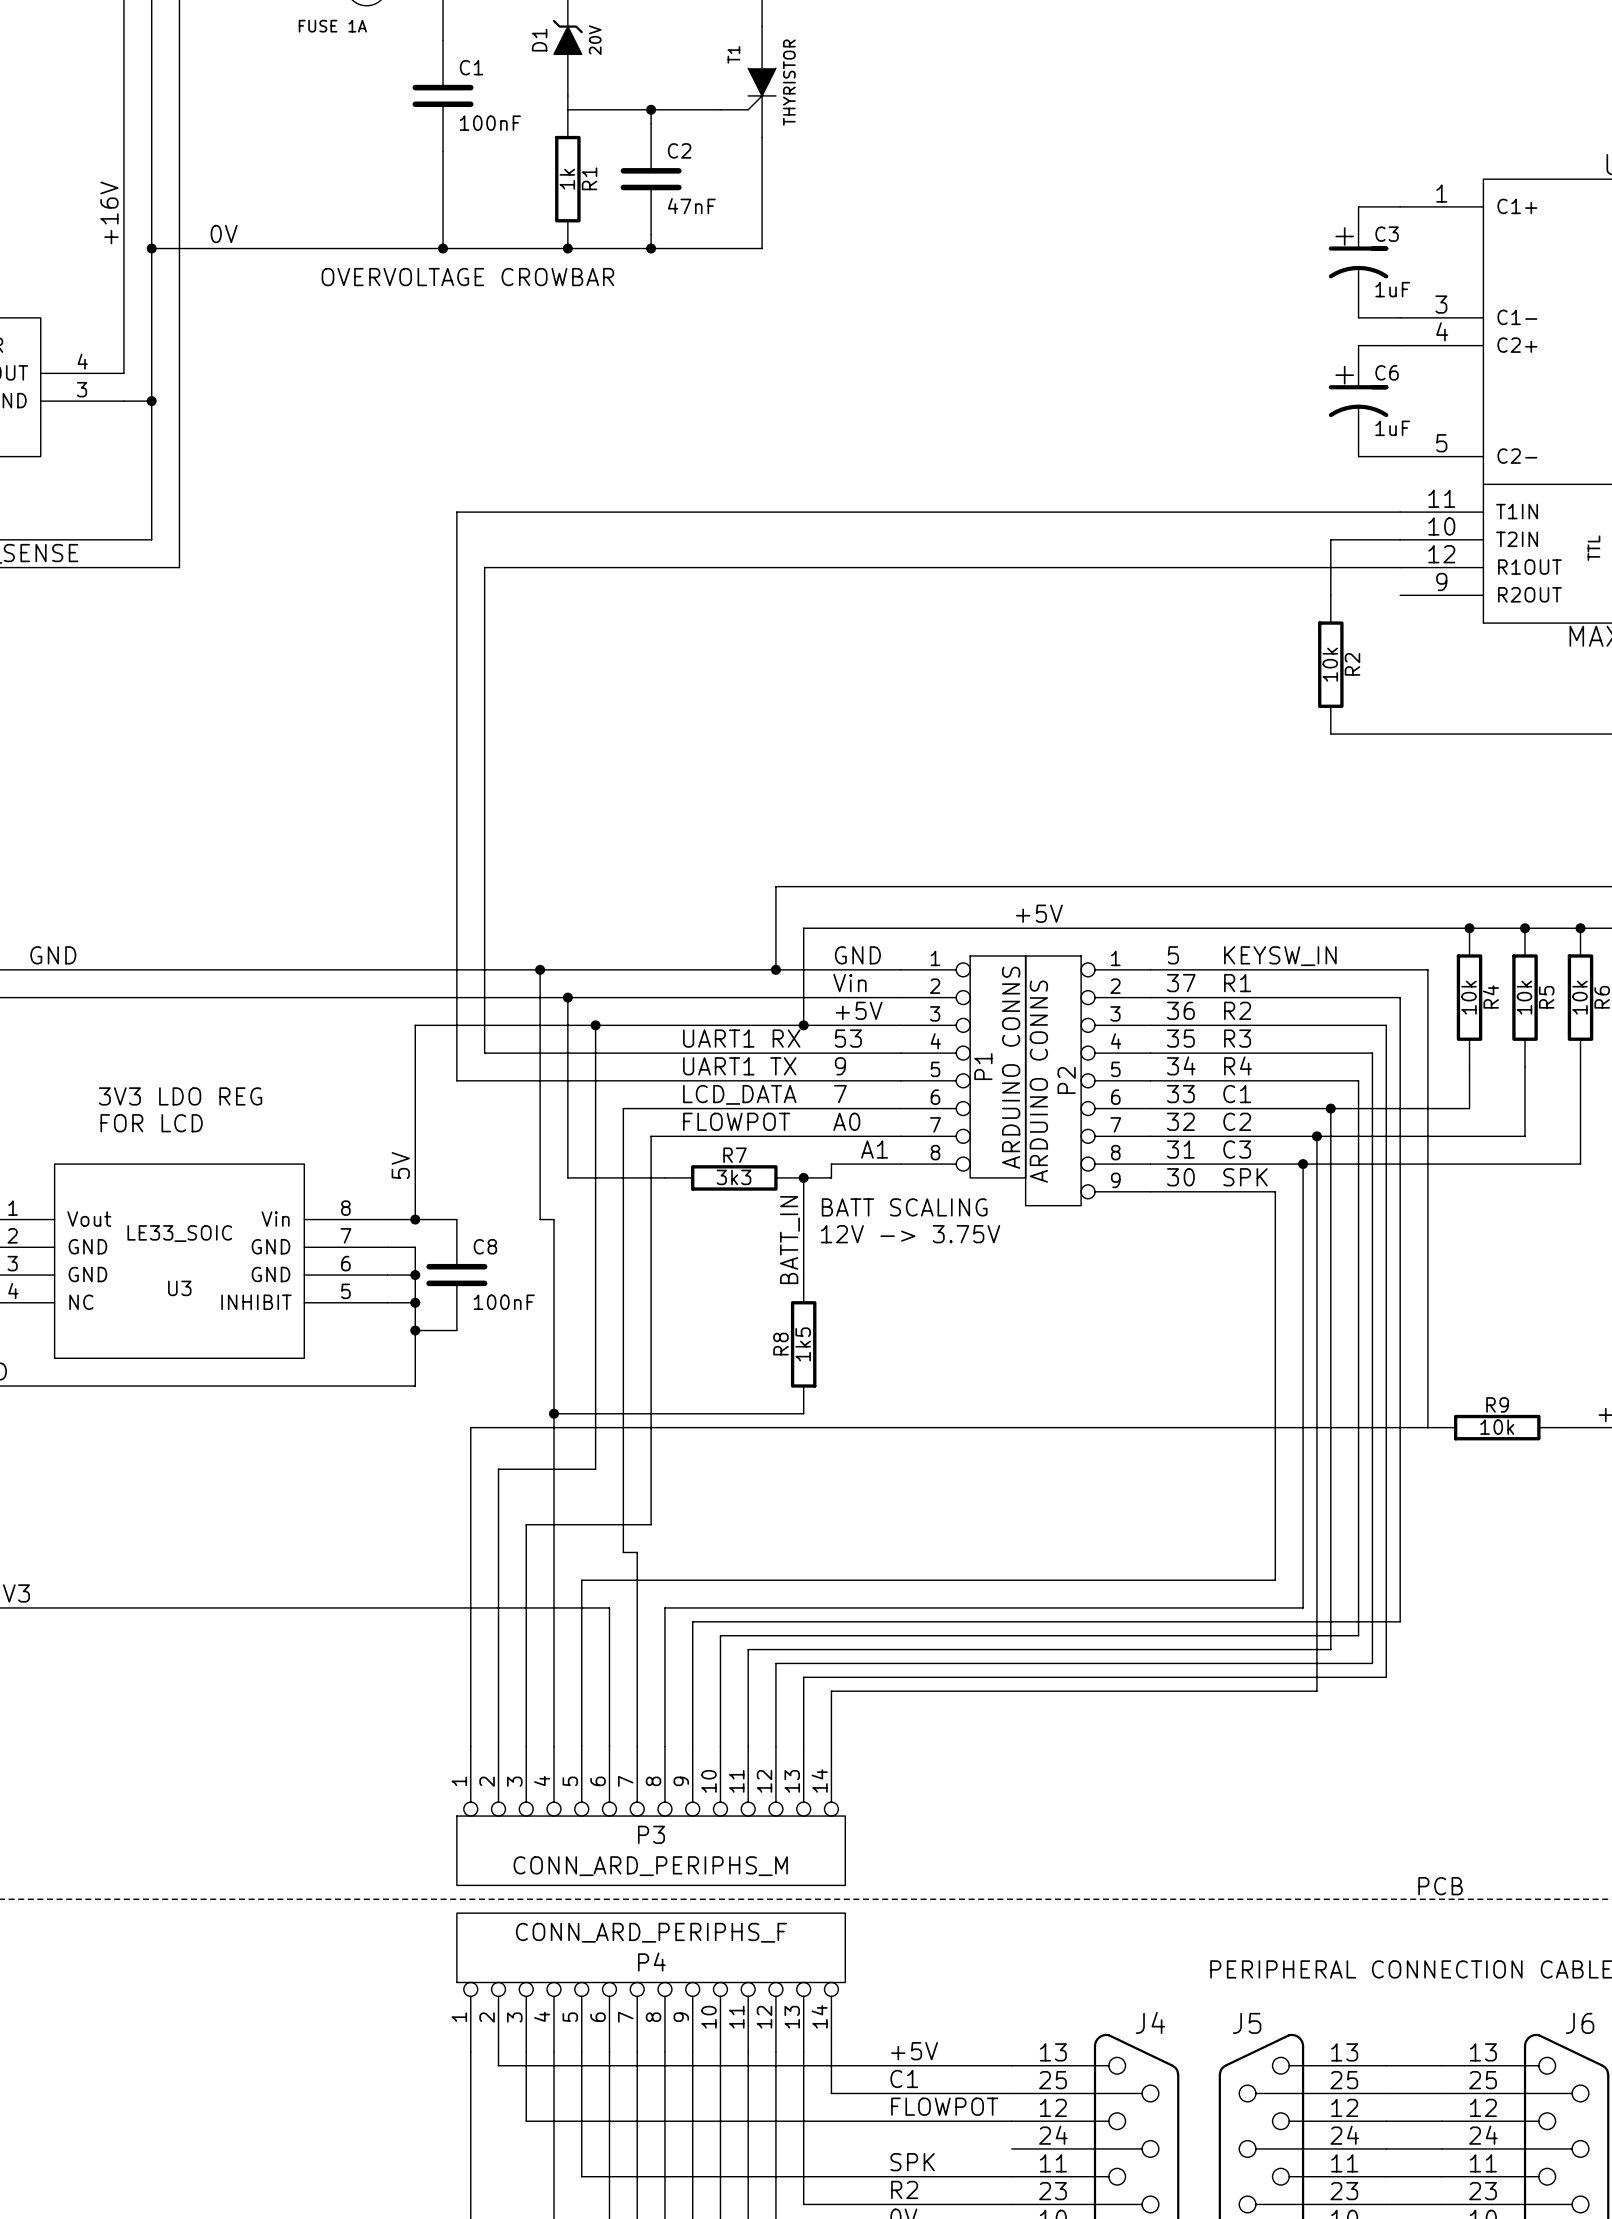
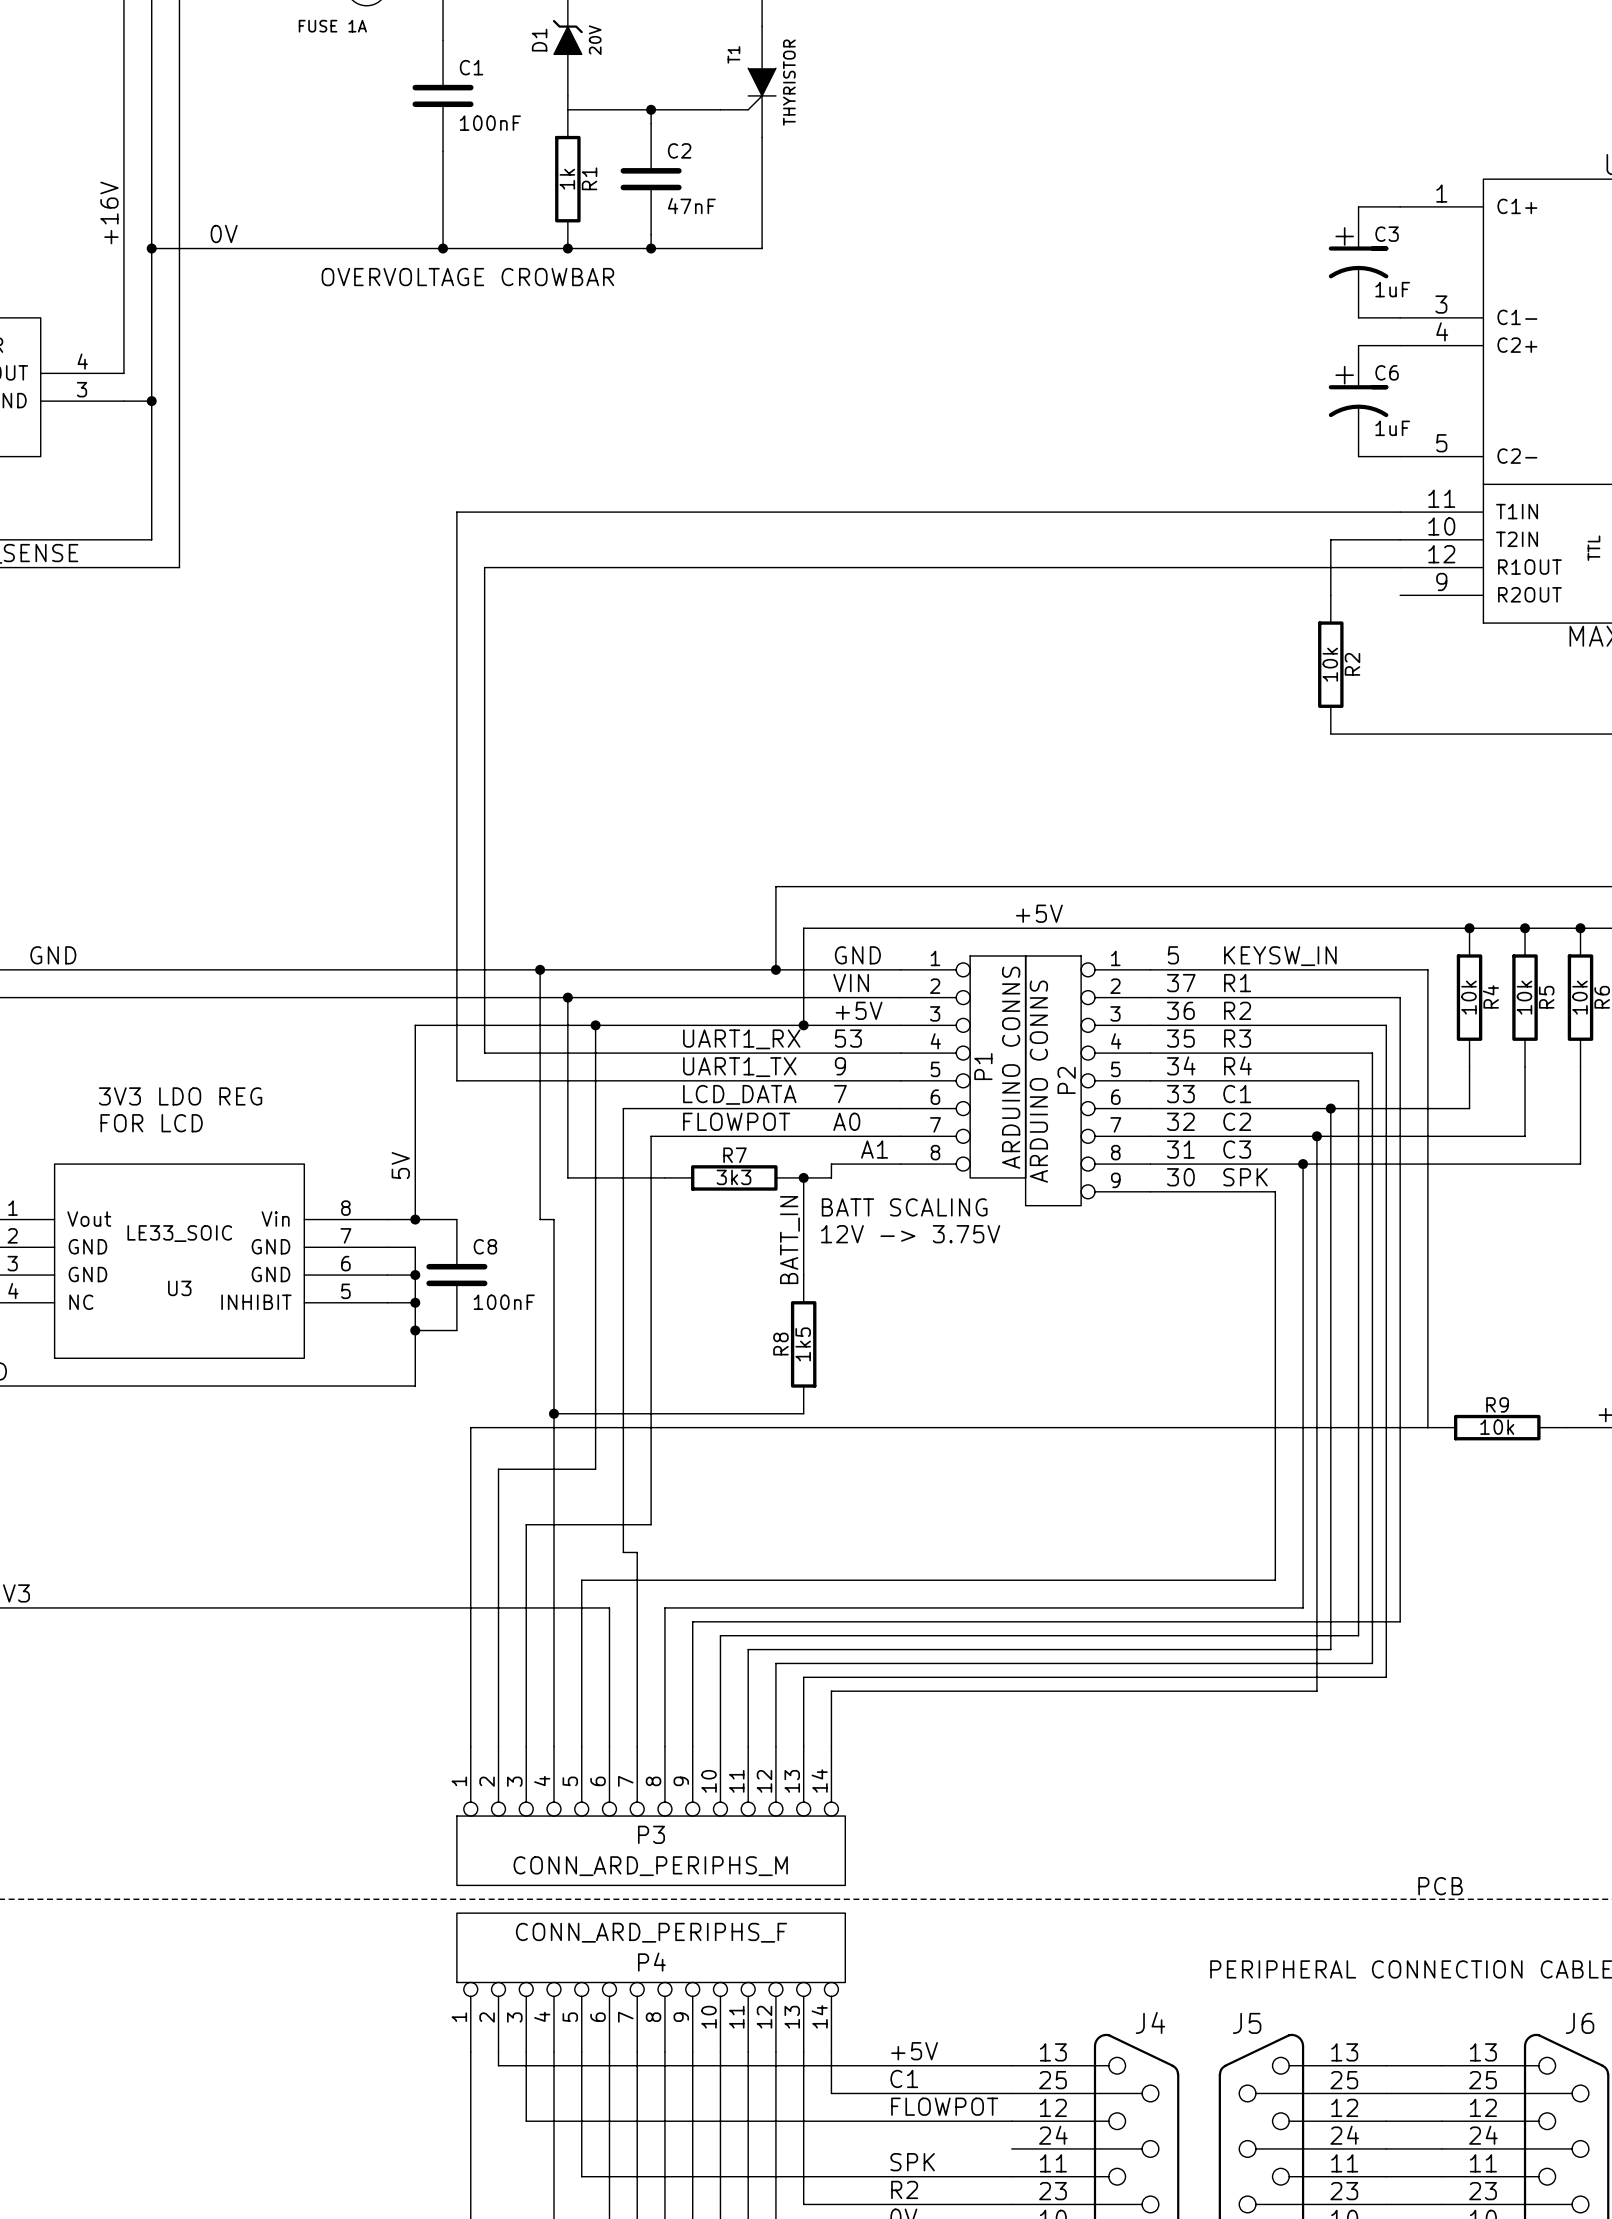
label: Vin (849, 983) -> VIN (851, 983)
label: UART1 RX (741, 1038) -> UART1_RX (741, 1039)
label: UART1 TX (739, 1066) -> UART1_TX (739, 1067)

